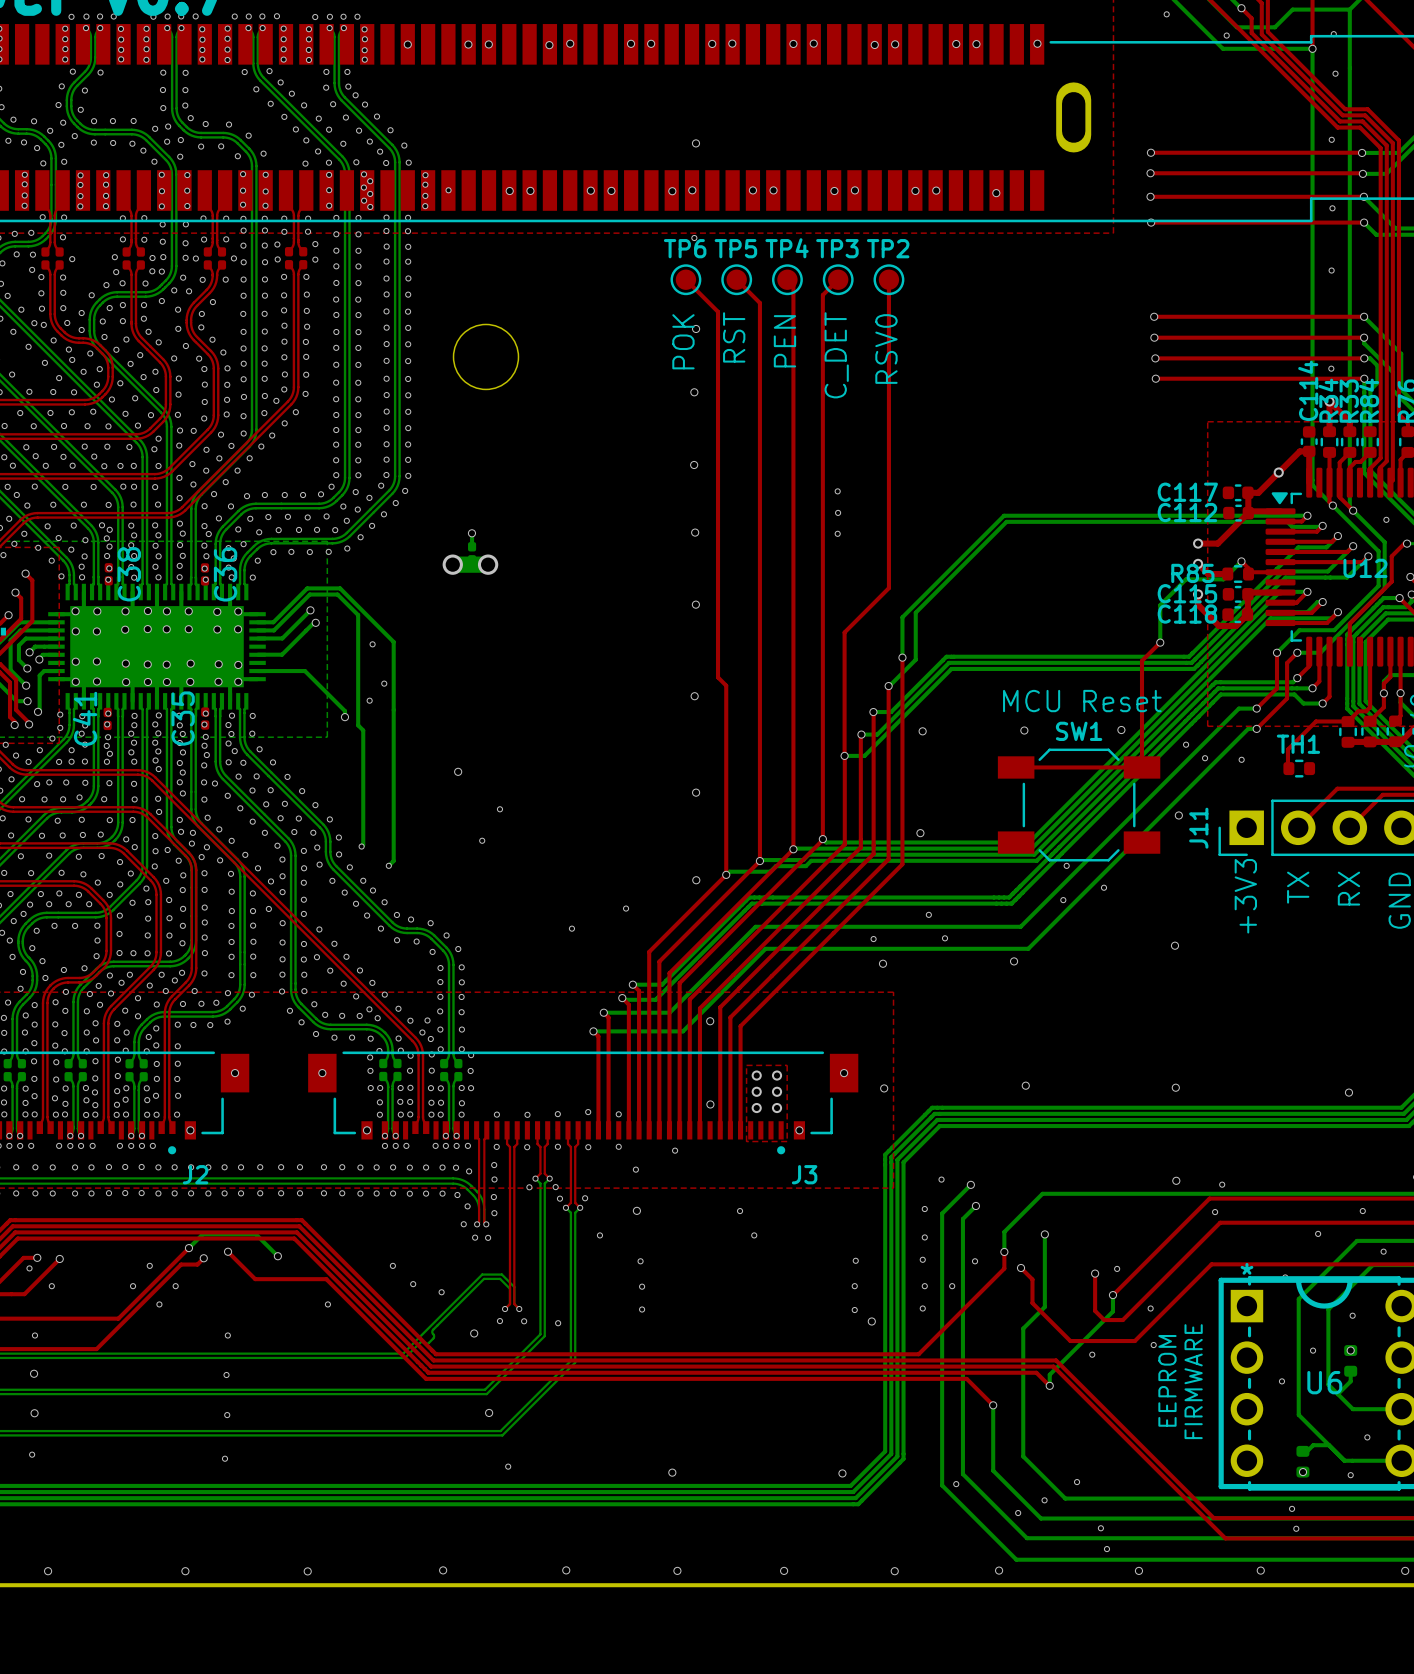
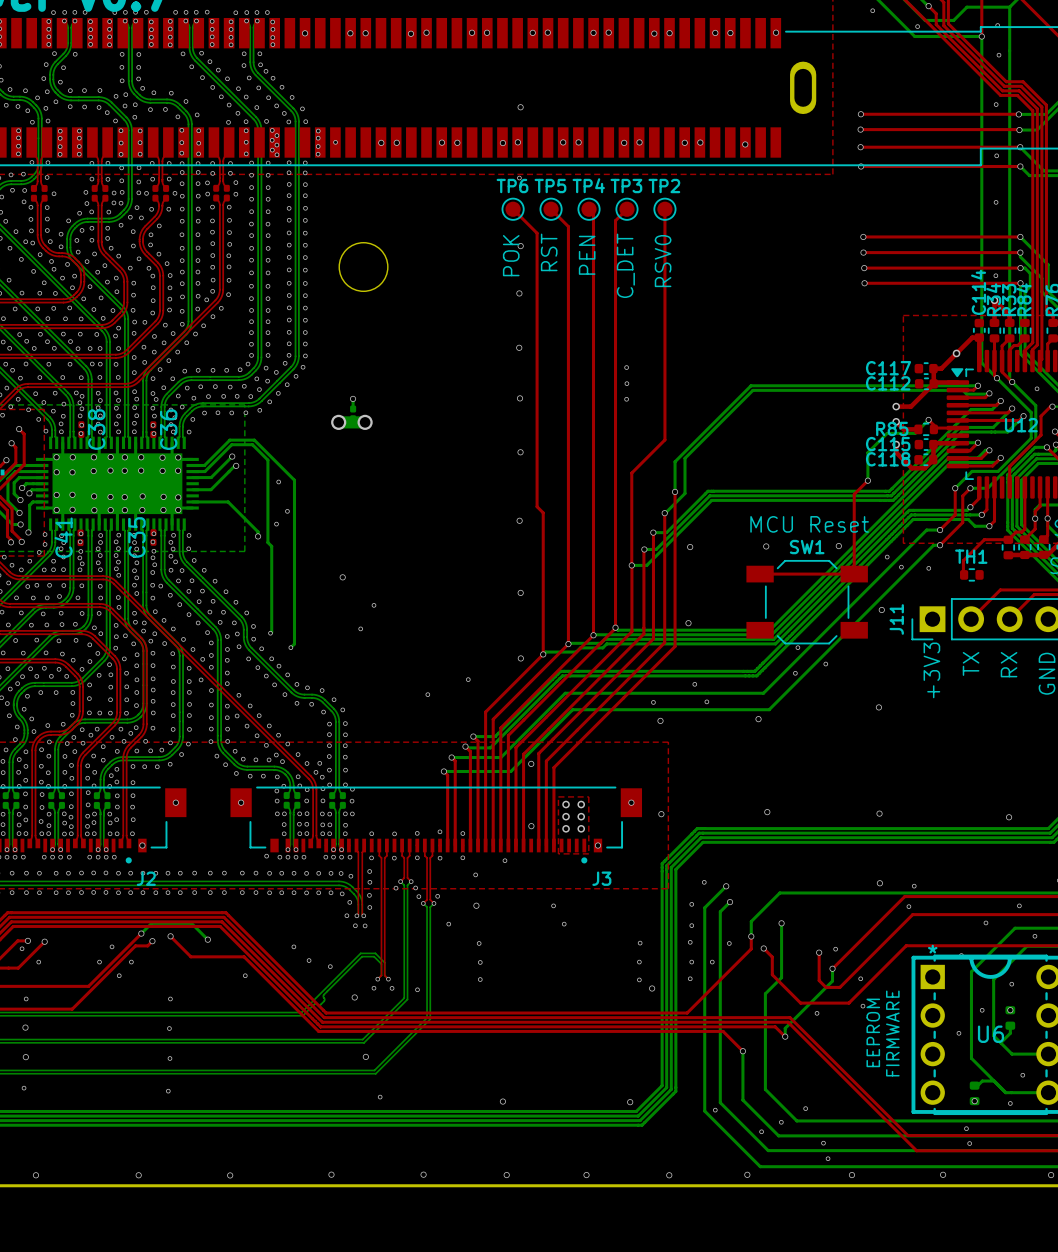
via: (367, 1130) -> none
via: none -> (266, 856)
via: none -> (279, 857)

